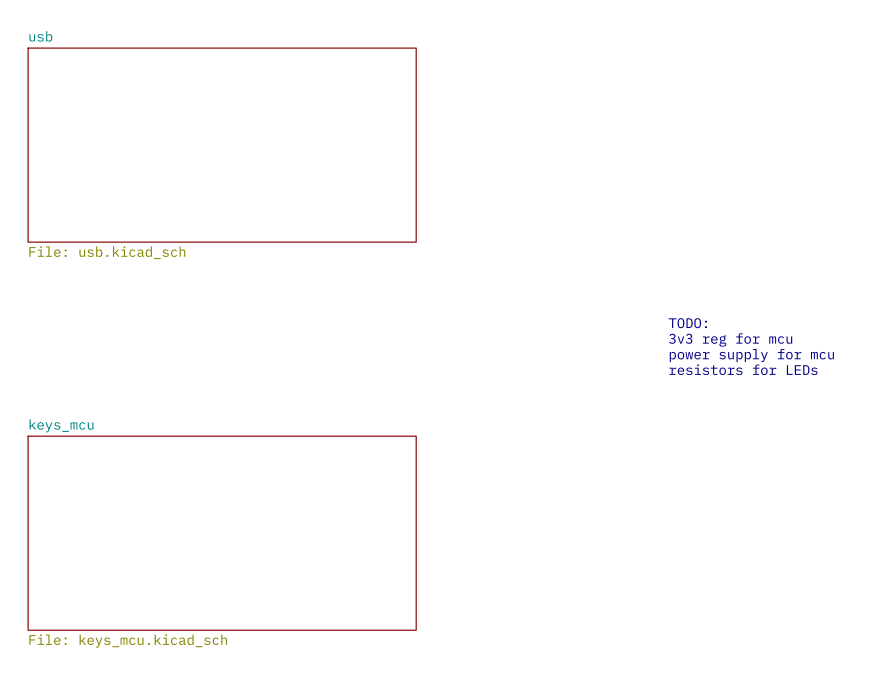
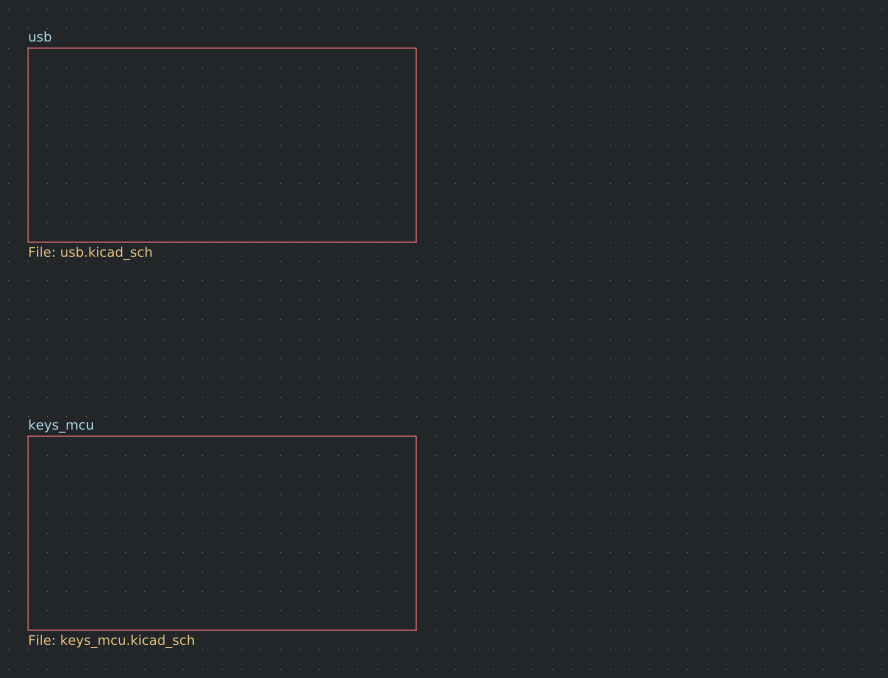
text: TODO: (687, 323) -> none
text: 3v3 reg for mcu (730, 339) -> none
text: power supply for mcu (751, 355) -> none
text: resistors for LEDs (743, 369) -> none

